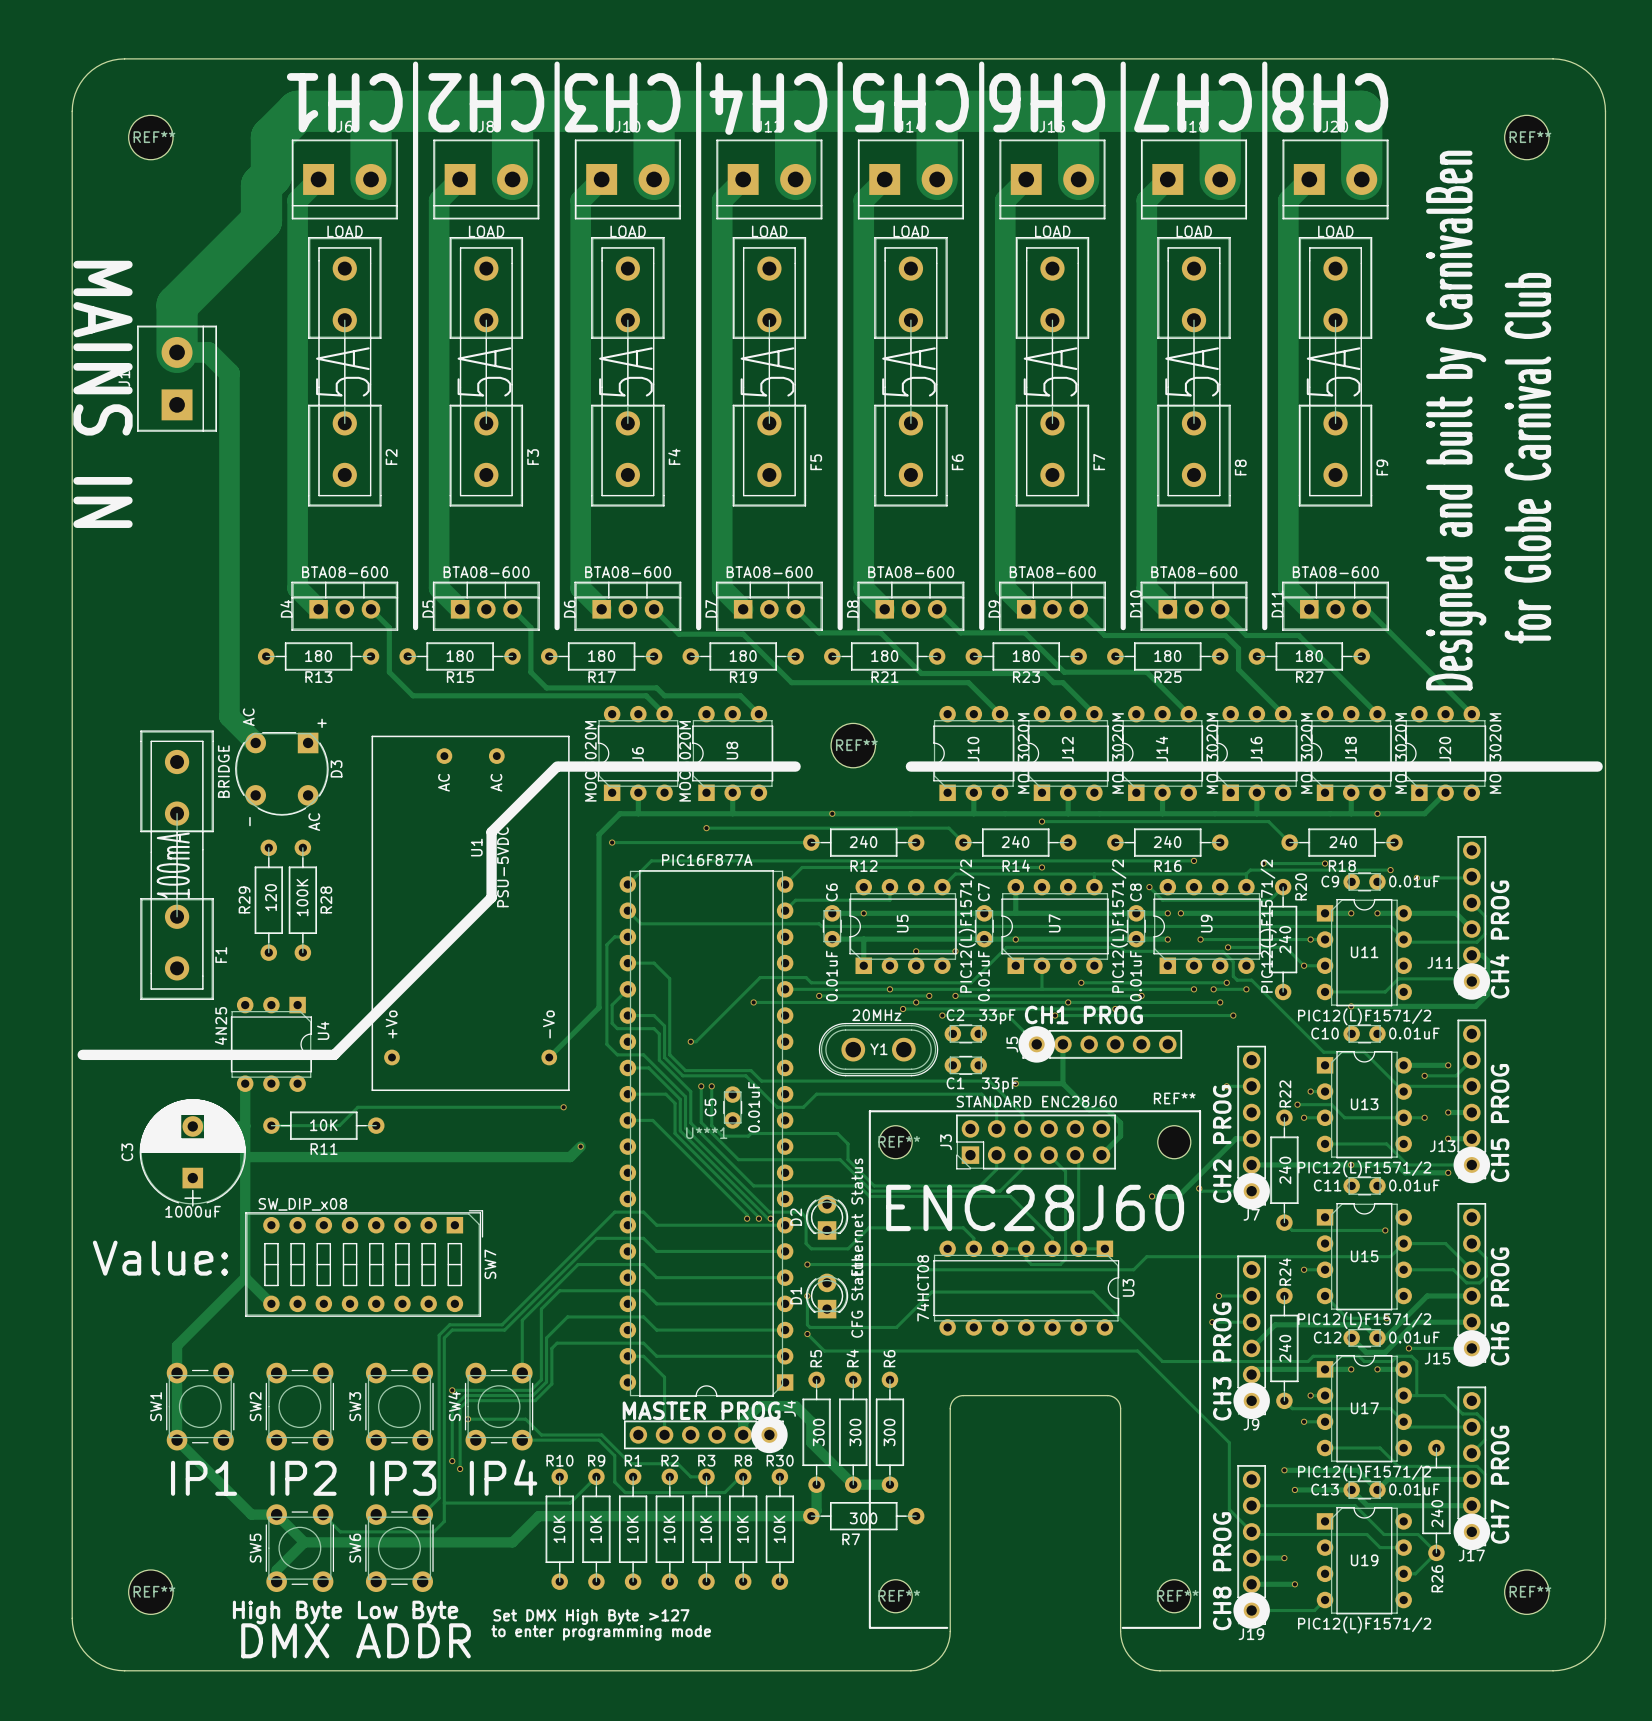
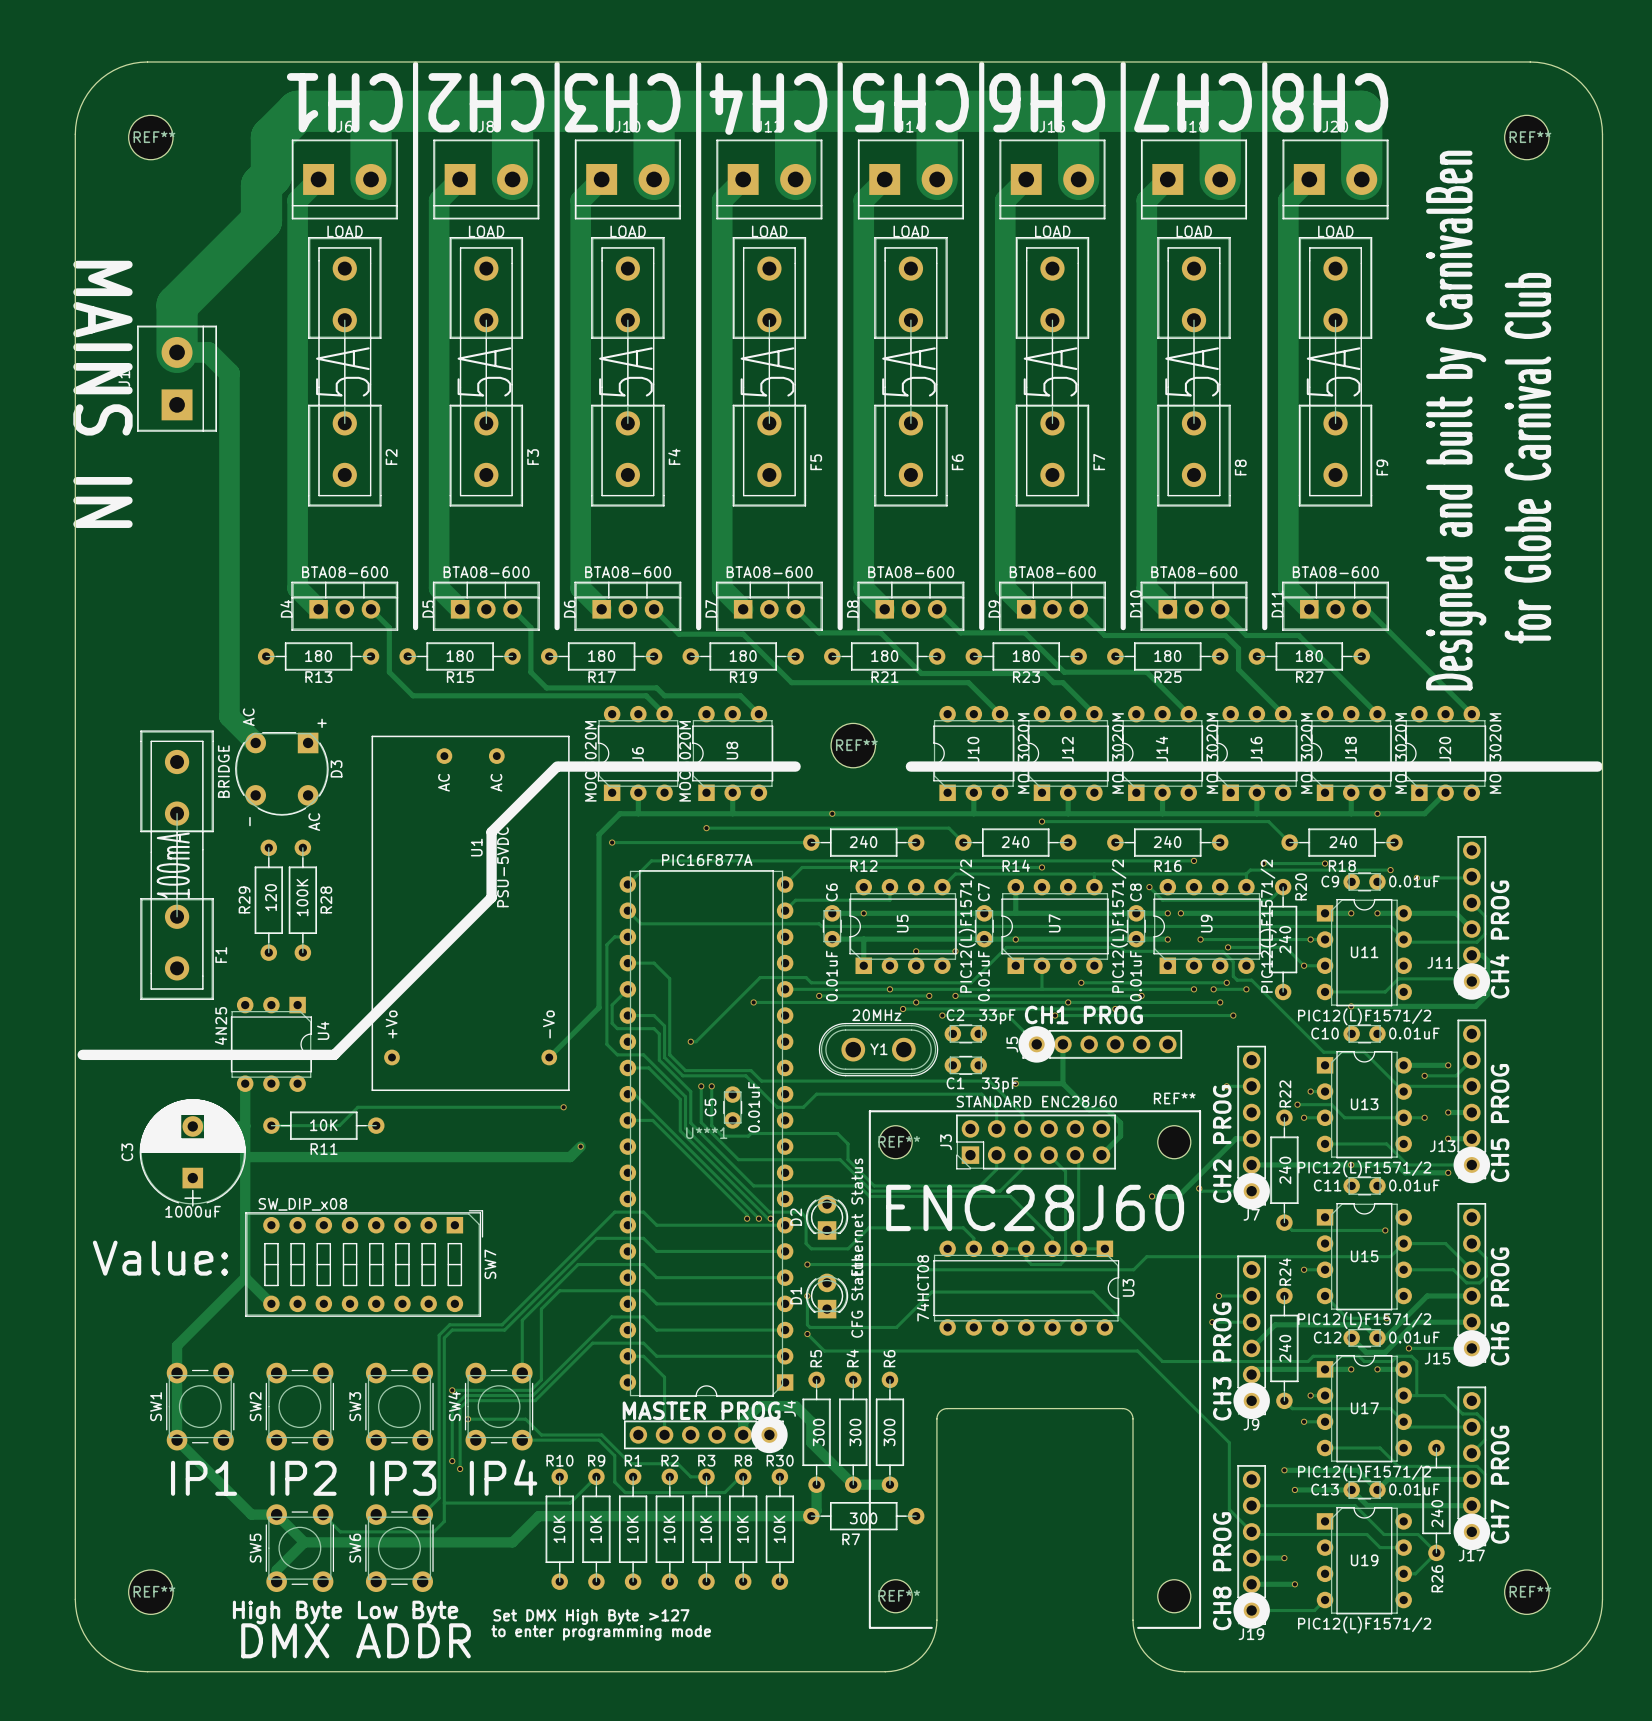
board edge: (124, 58) (1553, 58) (1575, 64) (1590, 74) (1600, 88) (1605, 111) (1605, 1618) (1600, 1641) (1590, 1655) (1575, 1665) (1553, 1670) (1159, 1670) (1140, 1665) (1125, 1651) (1120, 1636) (1120, 1408) (1116, 1399) (1107, 1395) (963, 1395) (952, 1400) (950, 1408) (949, 1636) (947, 1646) (938, 1659) (921, 1669) (124, 1670) (101, 1665) (87, 1655) (77, 1641) (72, 1618) (72, 111) (77, 88) (87, 74) (101, 64) (124, 58) -> (147, 61) (119, 67) (96, 83) (80, 106) (75, 134) (75, 1599) (78, 1620) (91, 1645) (113, 1663) (133, 1670) (147, 1671) (896, 1670) (907, 1666) (921, 1656) (931, 1642) (936, 1625) (936, 1418) (939, 1412) (947, 1408) (1122, 1408) (1129, 1411) (1132, 1418) (1133, 1625) (1140, 1647) (1148, 1656) (1162, 1666) (1184, 1671) (1530, 1671) (1551, 1668) (1576, 1655) (1593, 1633) (1601, 1613) (1602, 1599) (1602, 134) (1597, 106) (1586, 88) (1564, 70) (1551, 65) (1530, 61) (147, 61)
track: (634, 1094) (665, 1094) (675, 1103) (675, 1133) (758, 1217) -> (634, 1094) (758, 1218)
track: (611, 1316) (567, 1316) (546, 1338) (546, 1382) -> (611, 1316) (546, 1382)
track: (592, 1343) (557, 1343) (551, 1348) (551, 1383) -> (592, 1343) (551, 1383)
REF** name: REF** (1177, 1595) -> none
line: (931, 1627) (947, 1627) -> none
line: (1122, 1627) (1138, 1627) -> none

